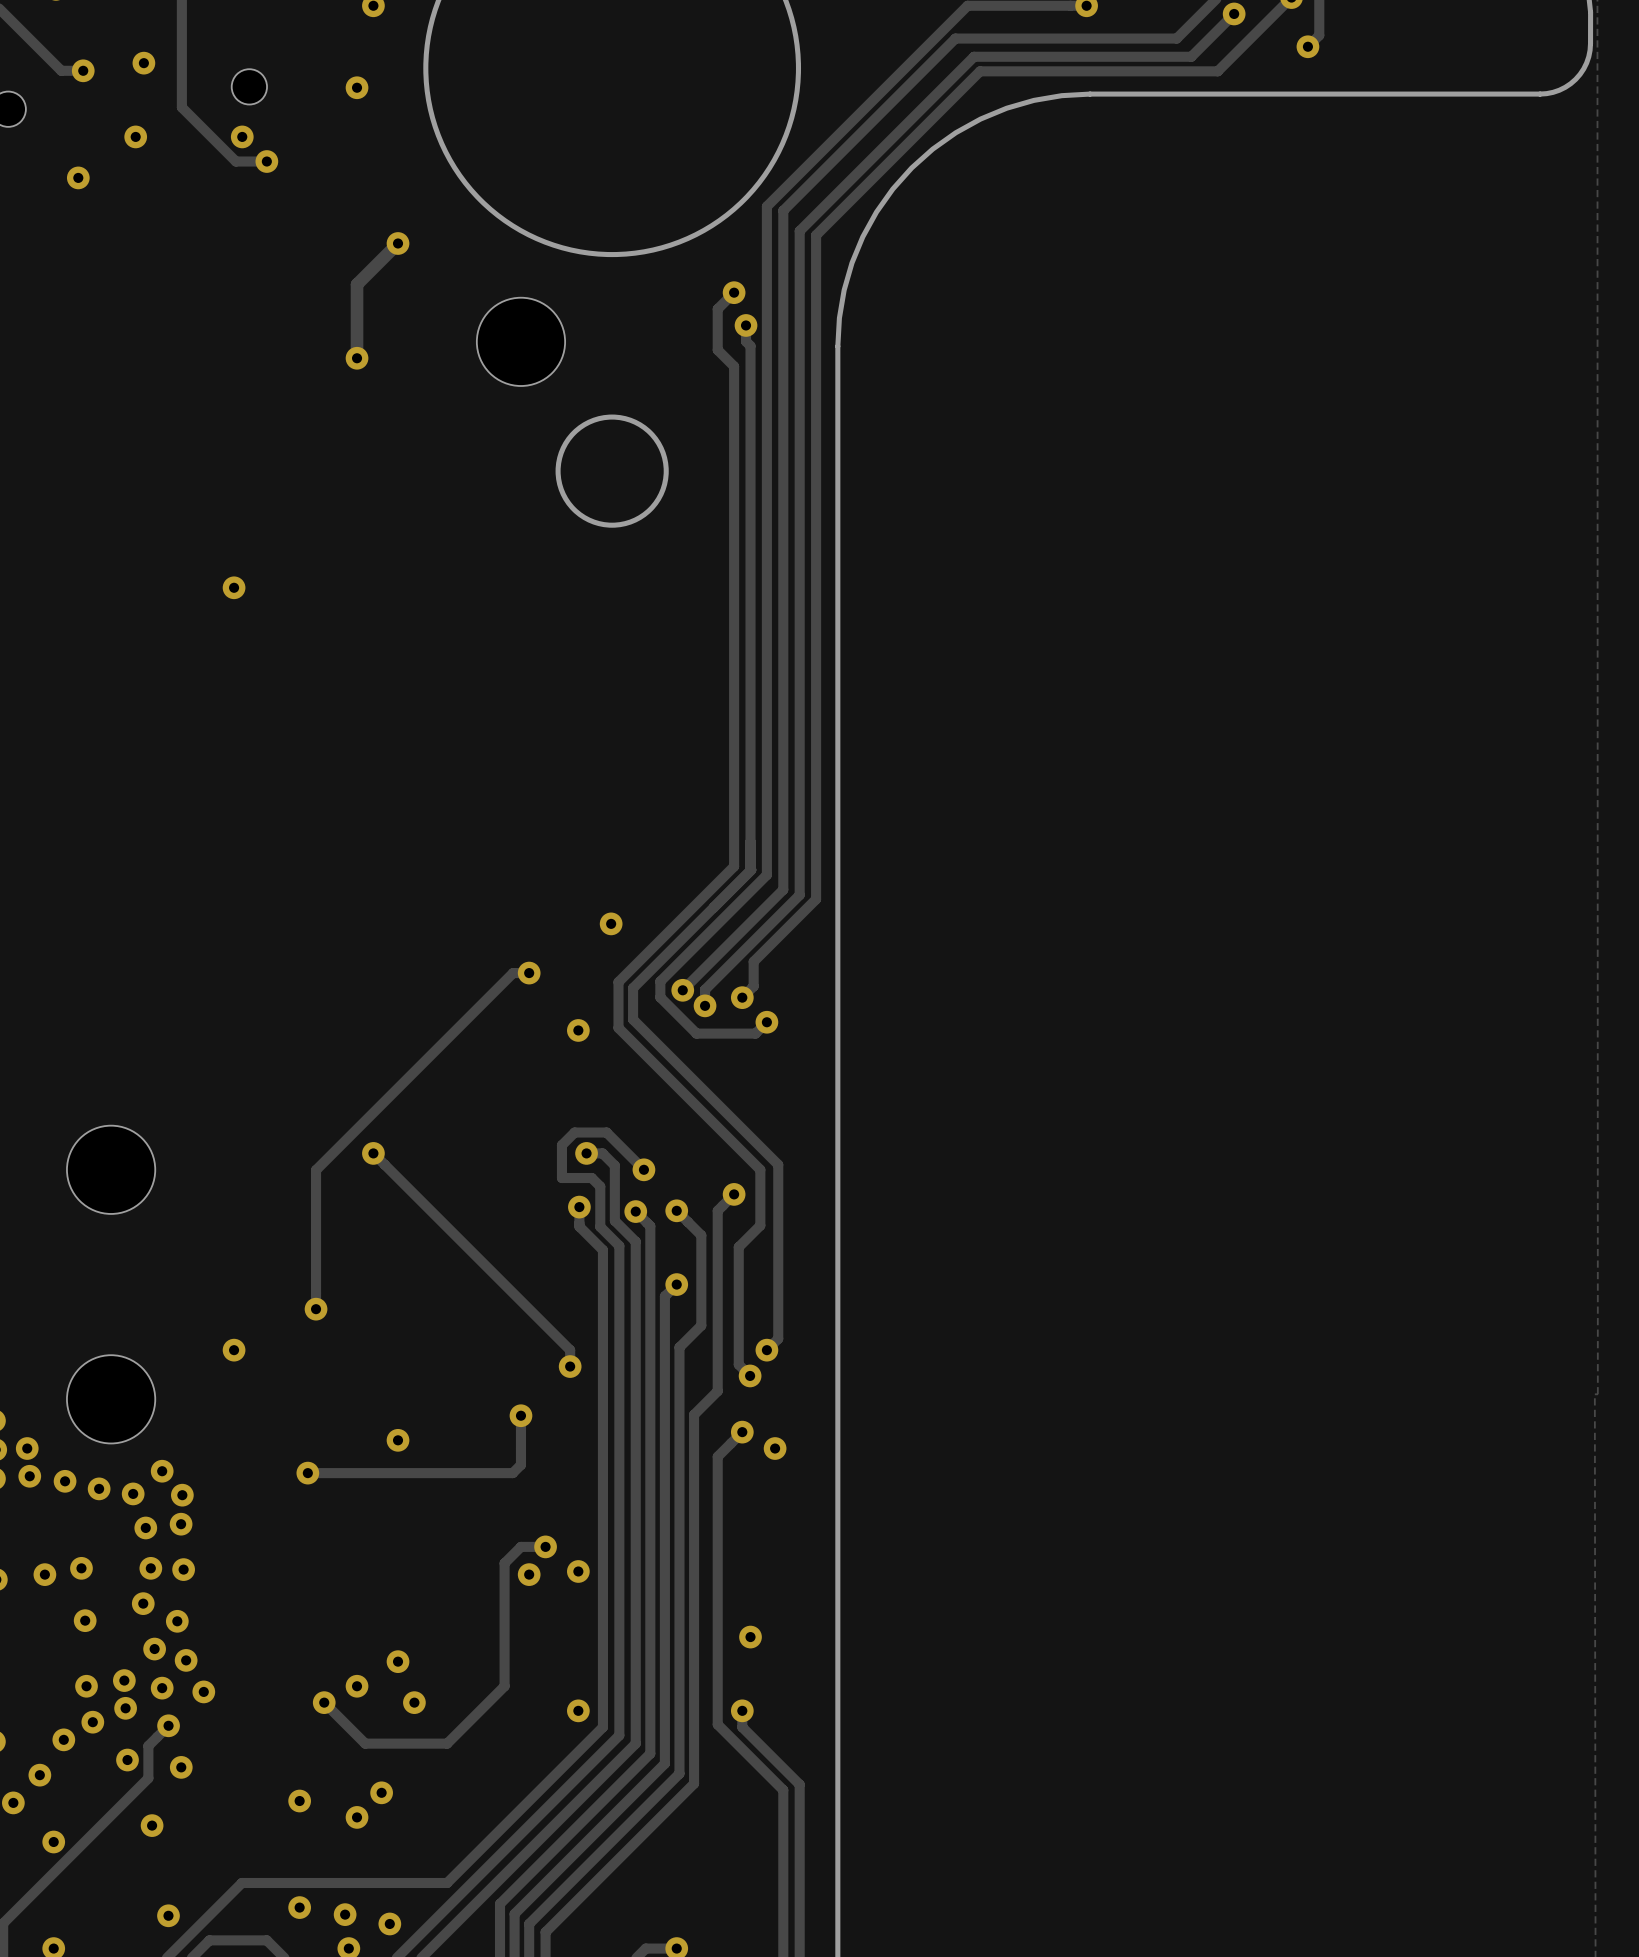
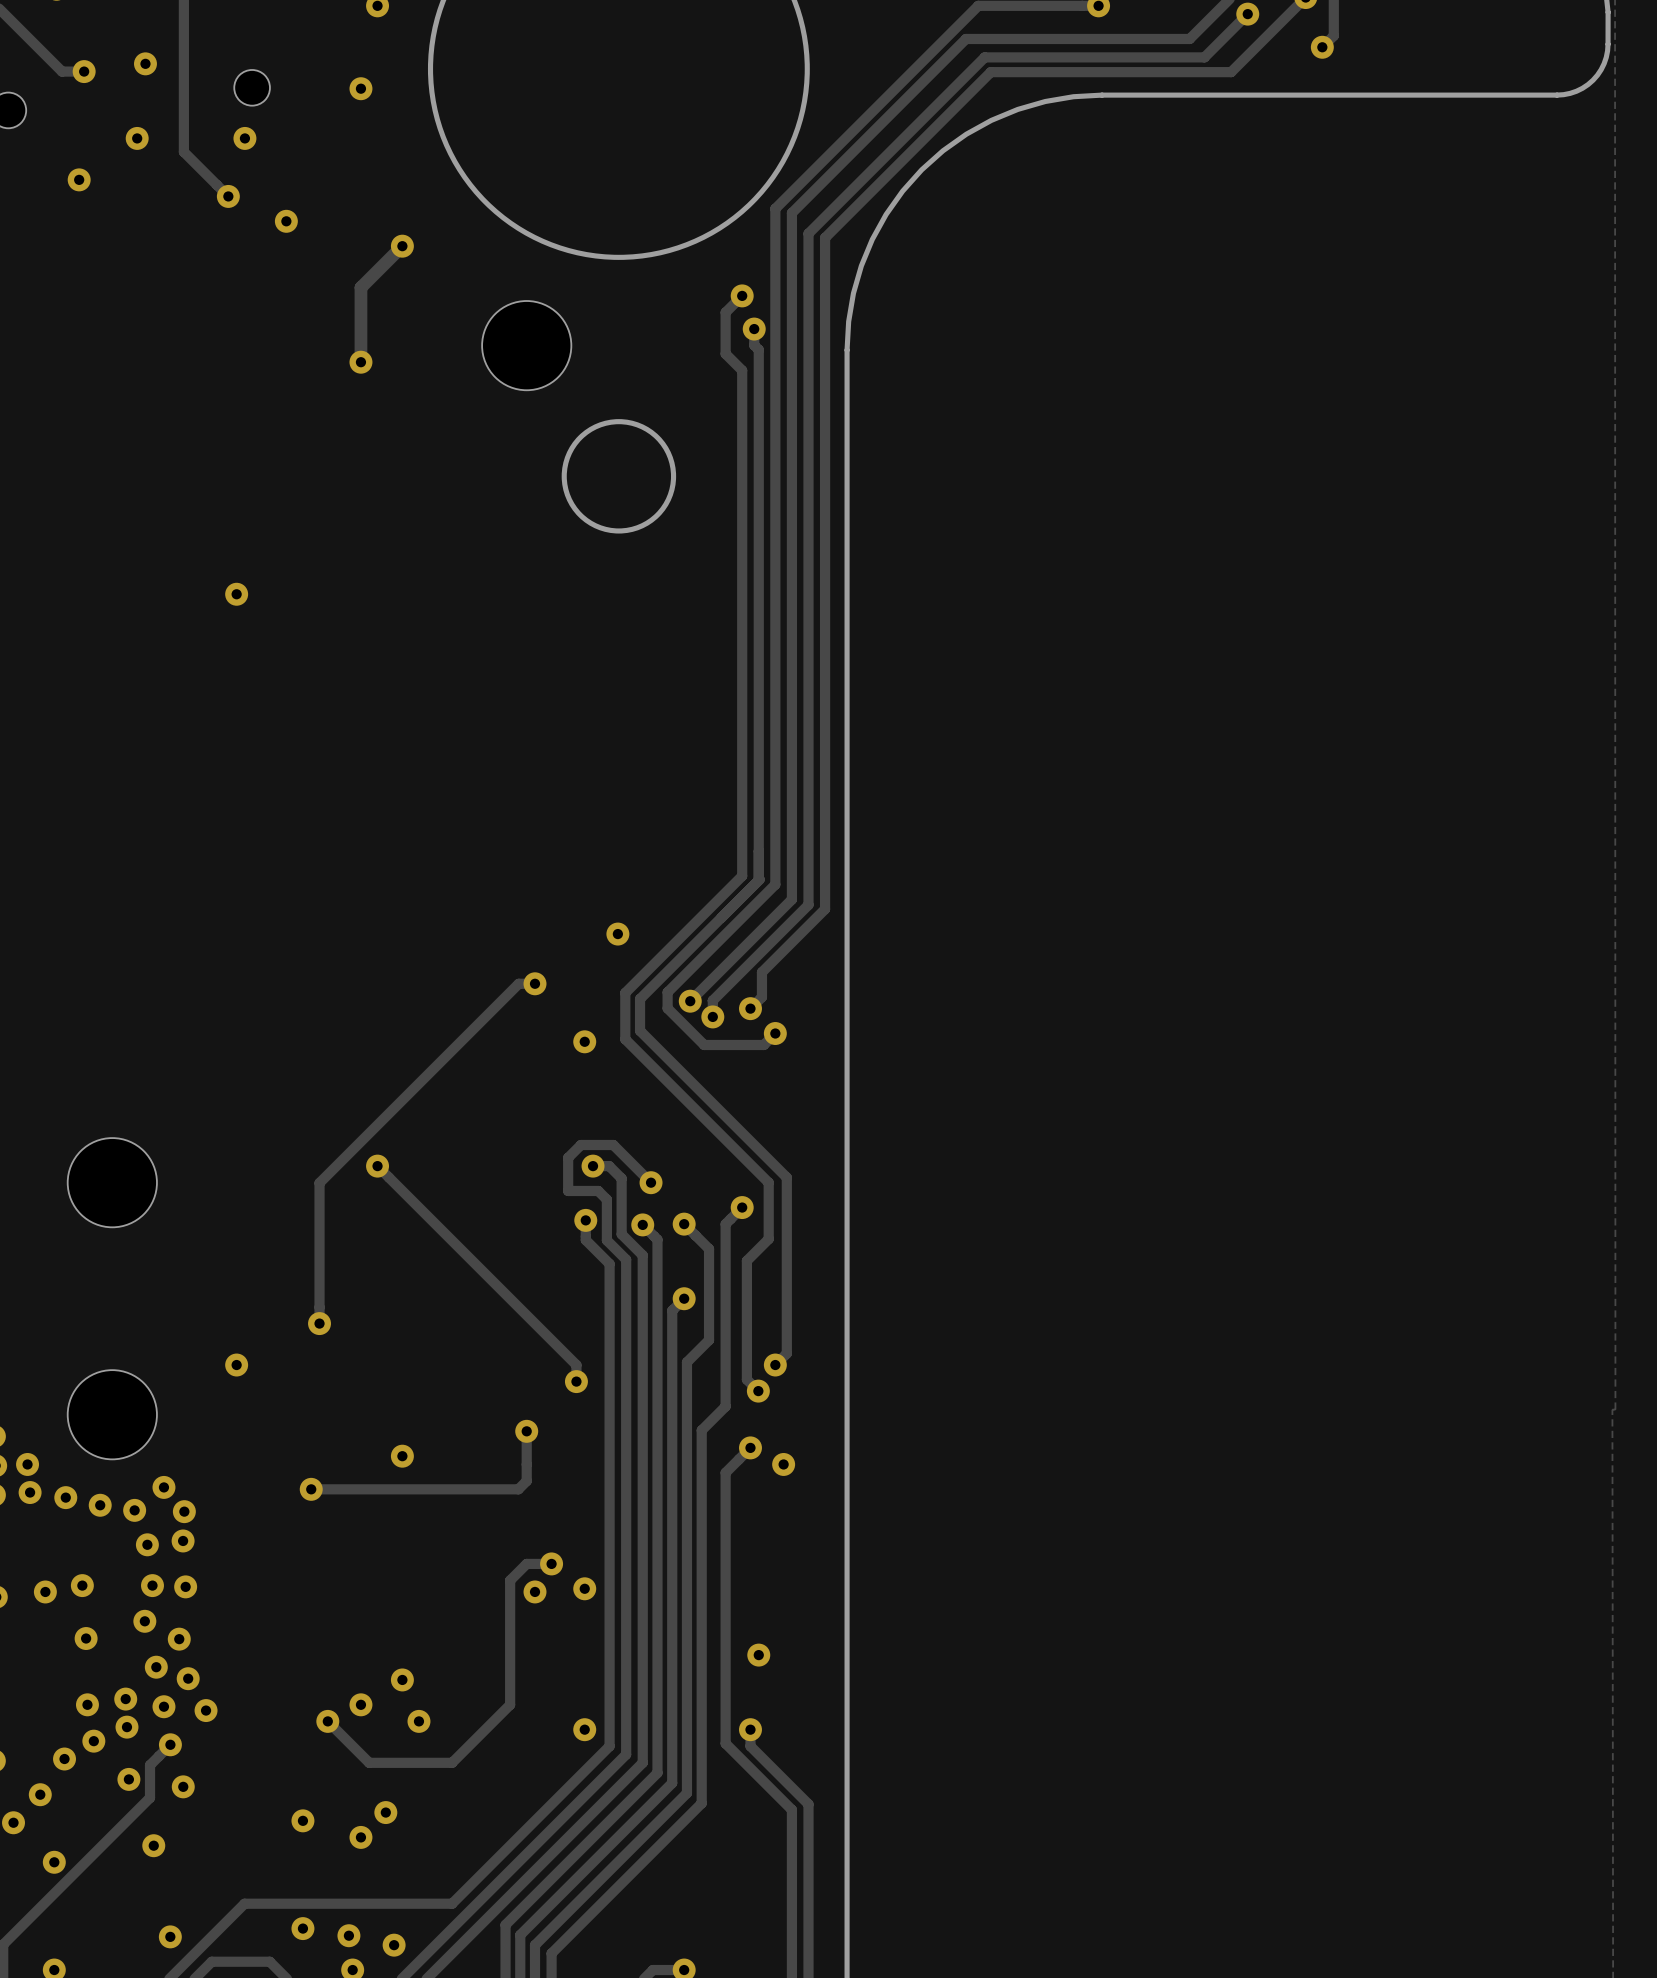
track: (181, 107) (235, 161) (266, 161) -> (183, 108) (183, 151) (228, 196)
via: (266, 161) -> none
via: none -> (228, 196)
via: none -> (286, 221)

